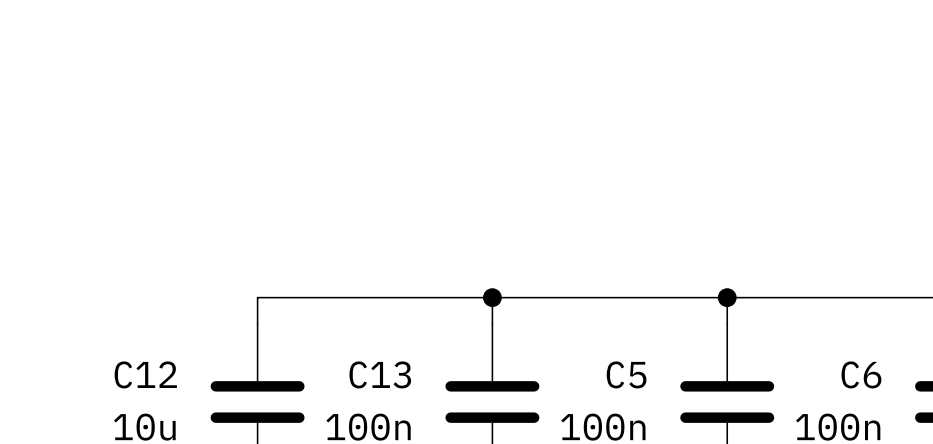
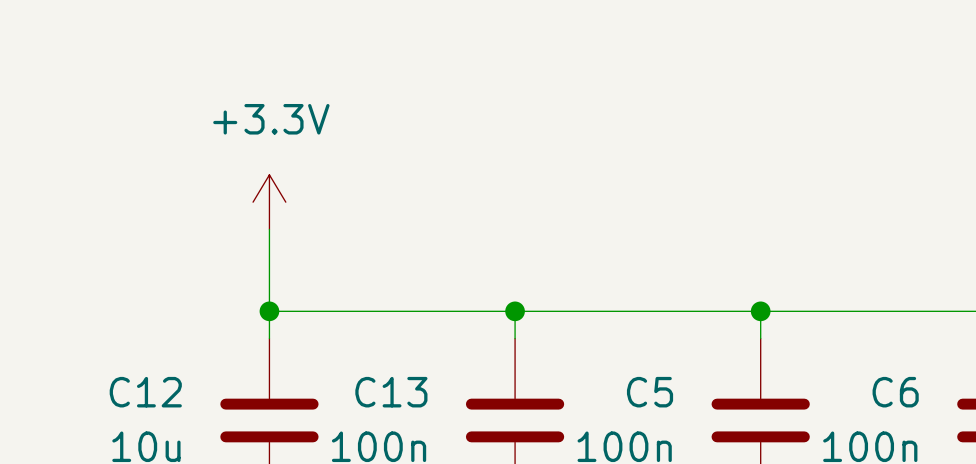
power symbol: none -> +3.3V (269, 202)
wire: none -> (269, 229) (269, 311)
junction: none -> (269, 311)

